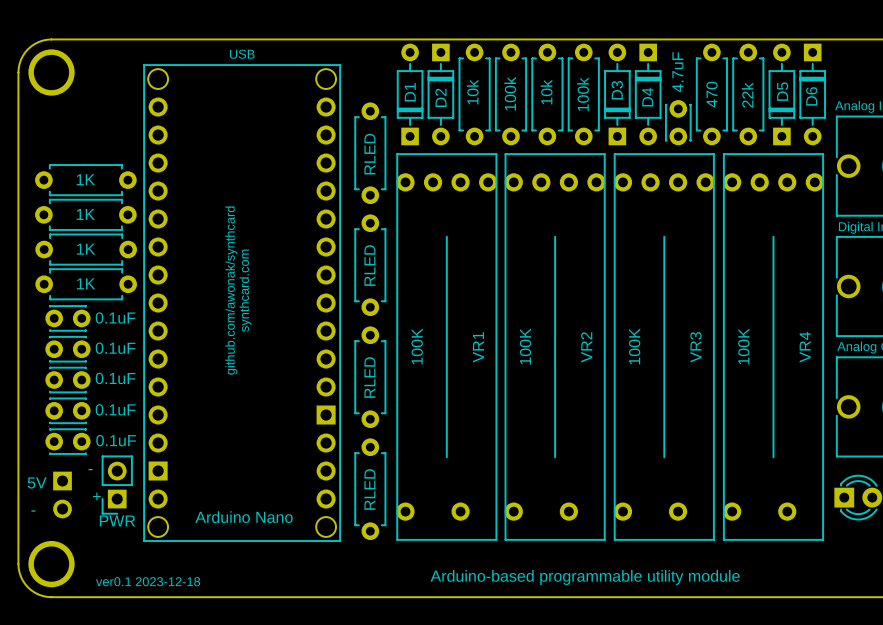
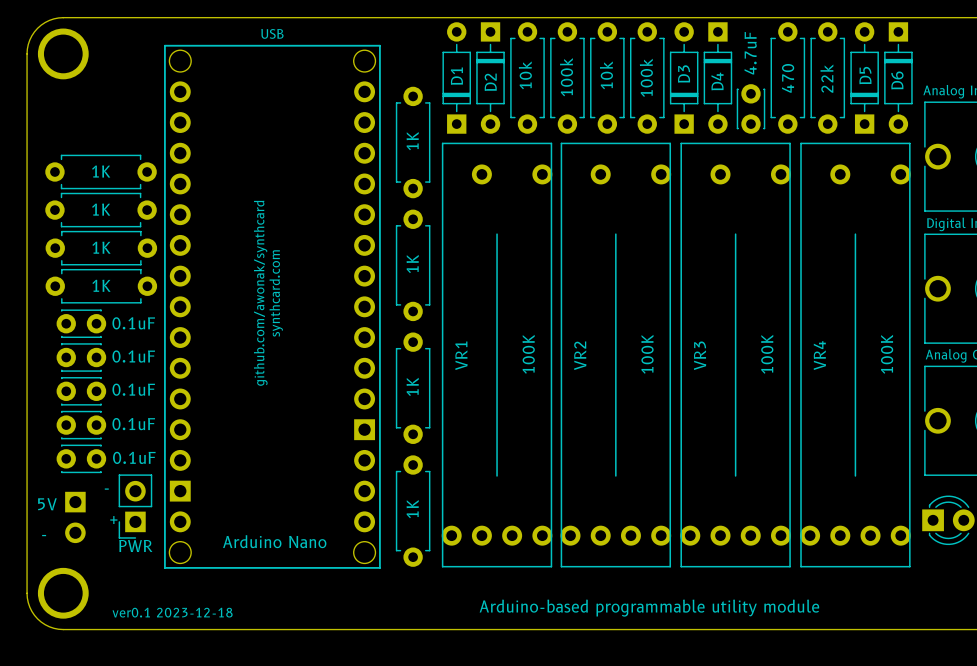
part value: RLED (369, 154) -> 1K (412, 141)
part value: RLED (369, 265) -> 1K (412, 264)
VR1 rotation: 0° (446, 346) -> 180° (497, 355)
VR2 rotation: 0° (555, 346) -> 180° (615, 355)
VR3 rotation: 0° (664, 346) -> 180° (735, 355)
VR4 rotation: 0° (773, 346) -> 180° (855, 355)
part value: RLED (369, 377) -> 1K (412, 386)
part value: RLED (369, 489) -> 1K (412, 509)

